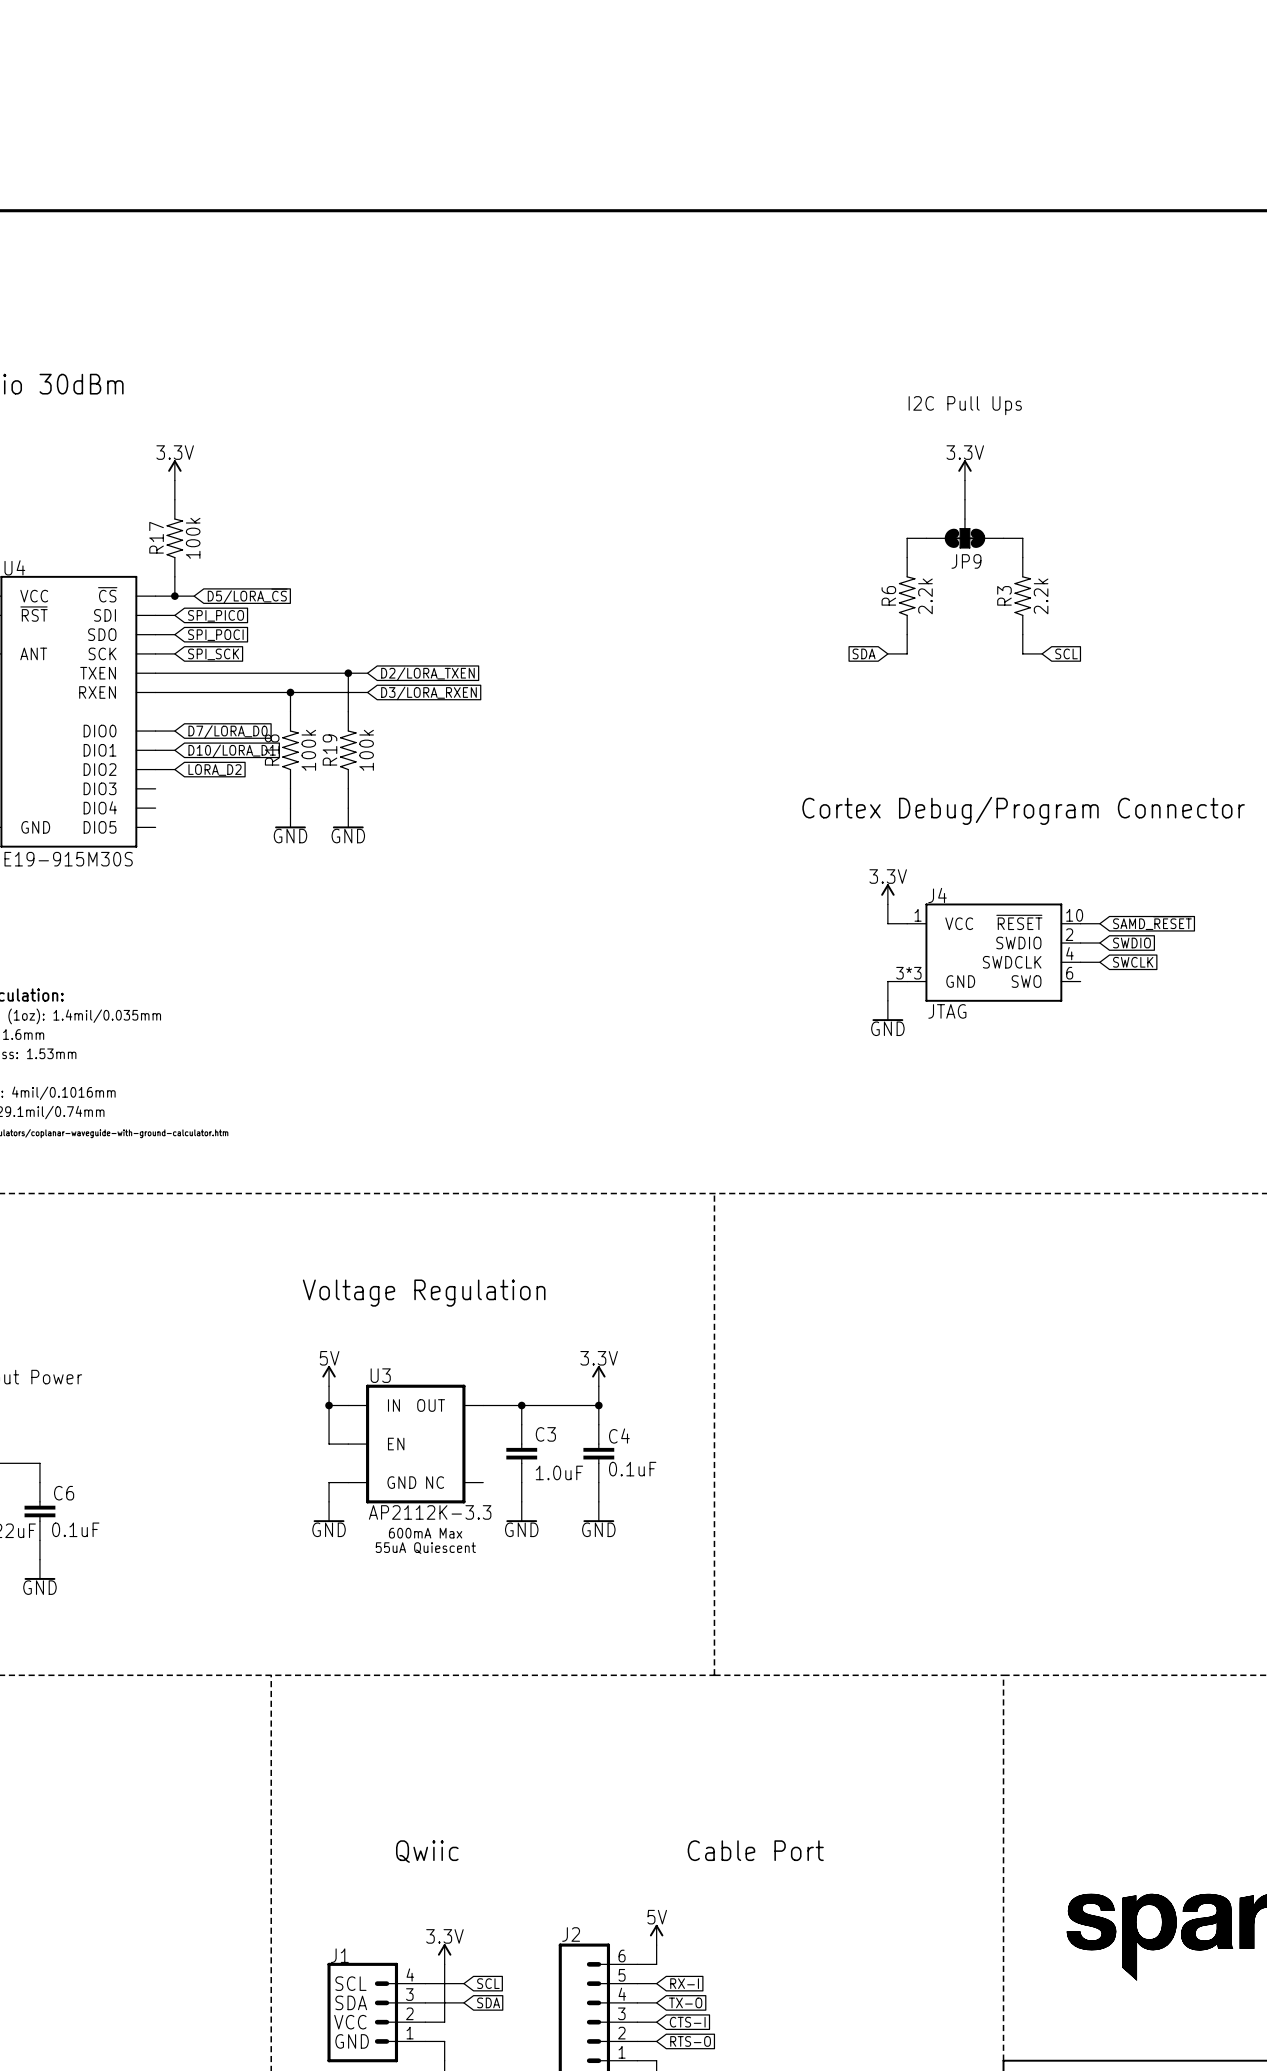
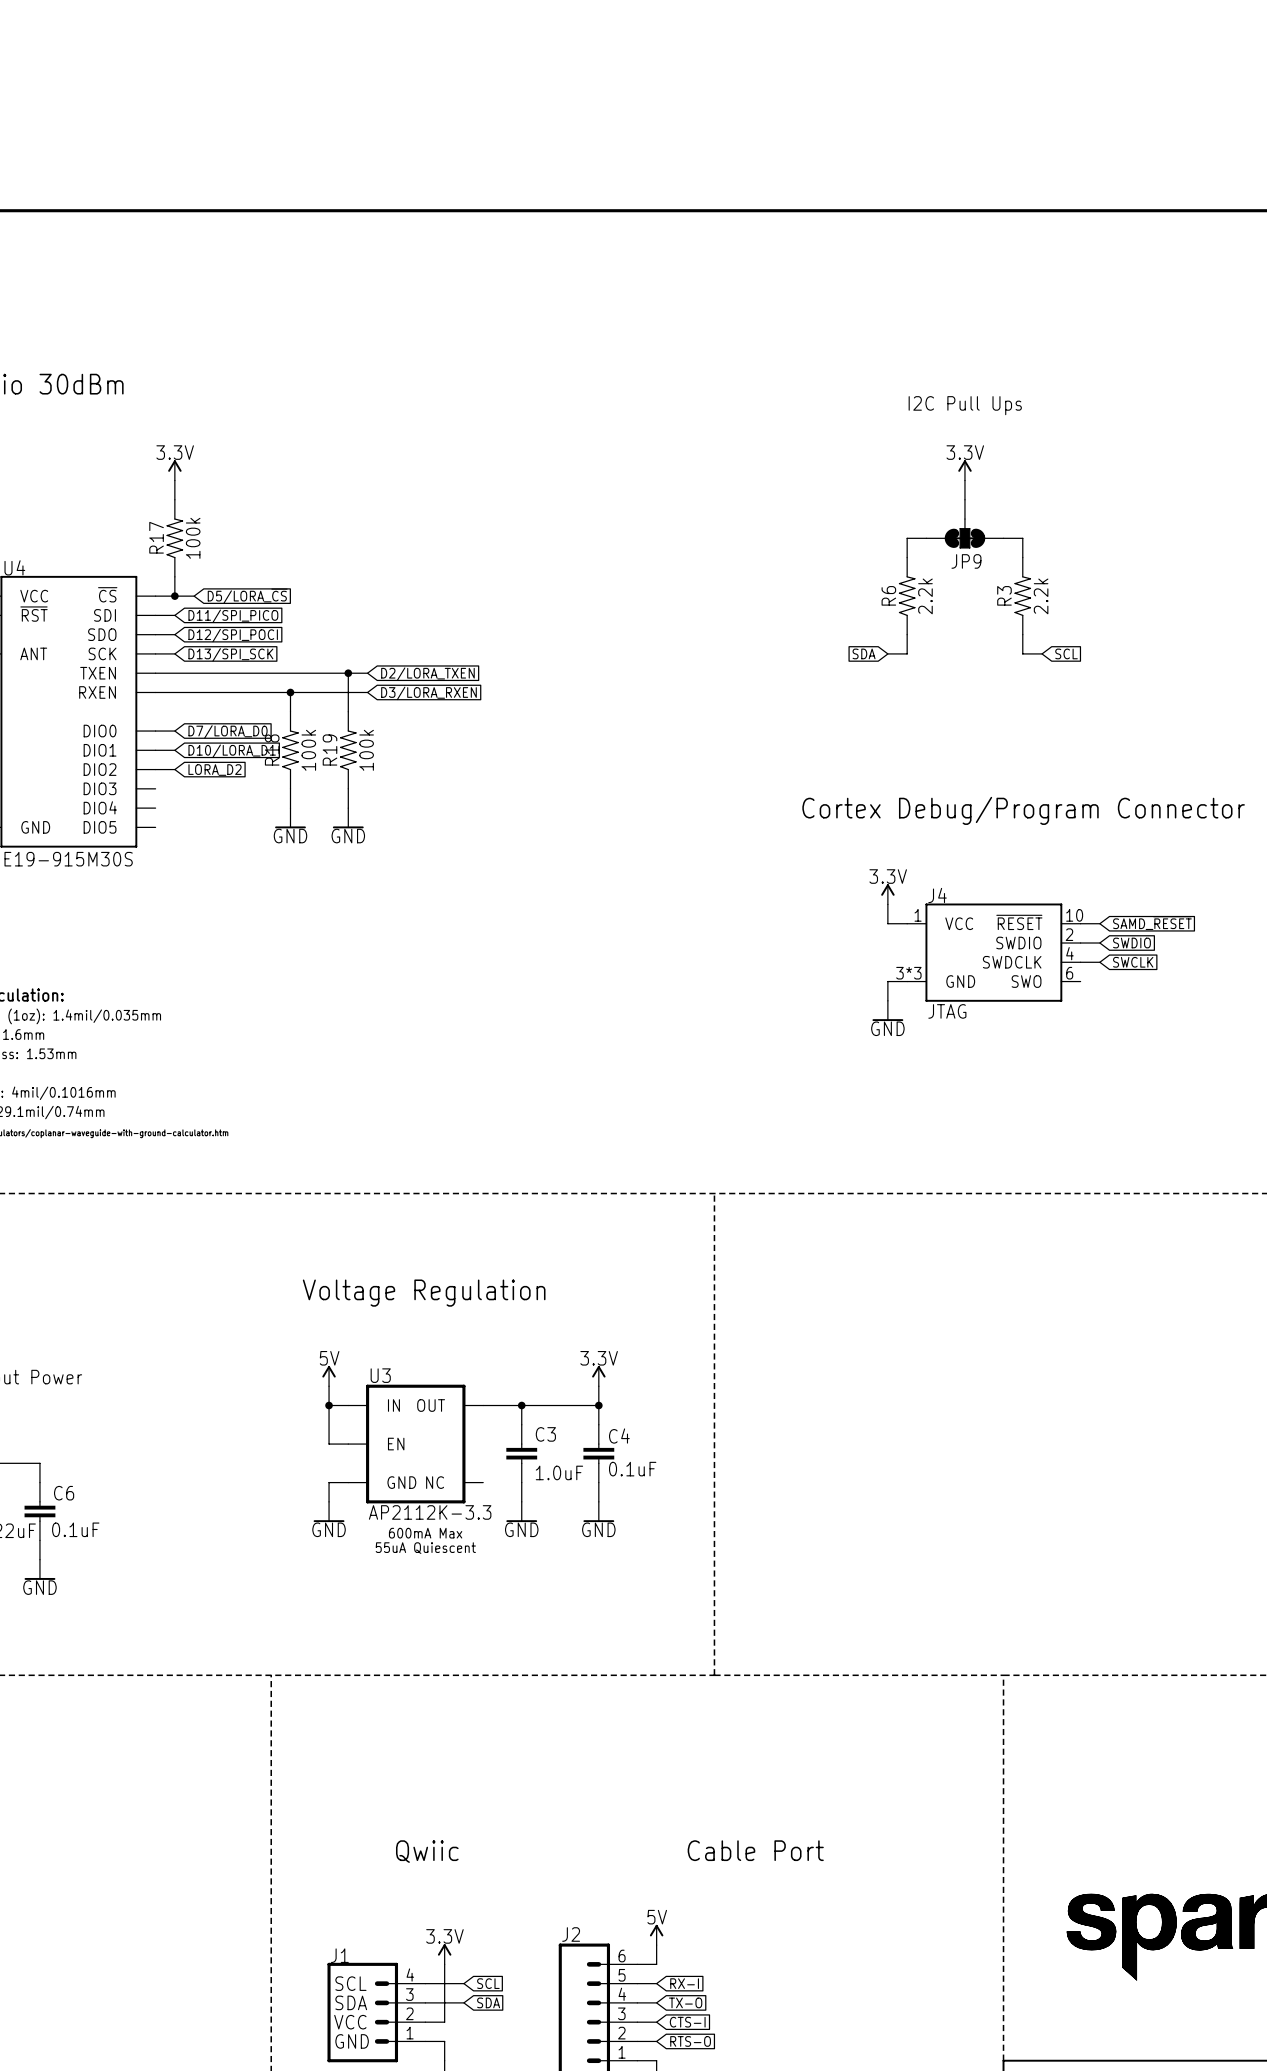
global label: SPI_PICO (216, 615) -> D11/SPI_PICO (233, 616)
global label: SPI_POCI (215, 635) -> D12/SPI_POCI (233, 635)
global label: SPI_SCK (213, 654) -> D13/SPI_SCK (230, 654)

